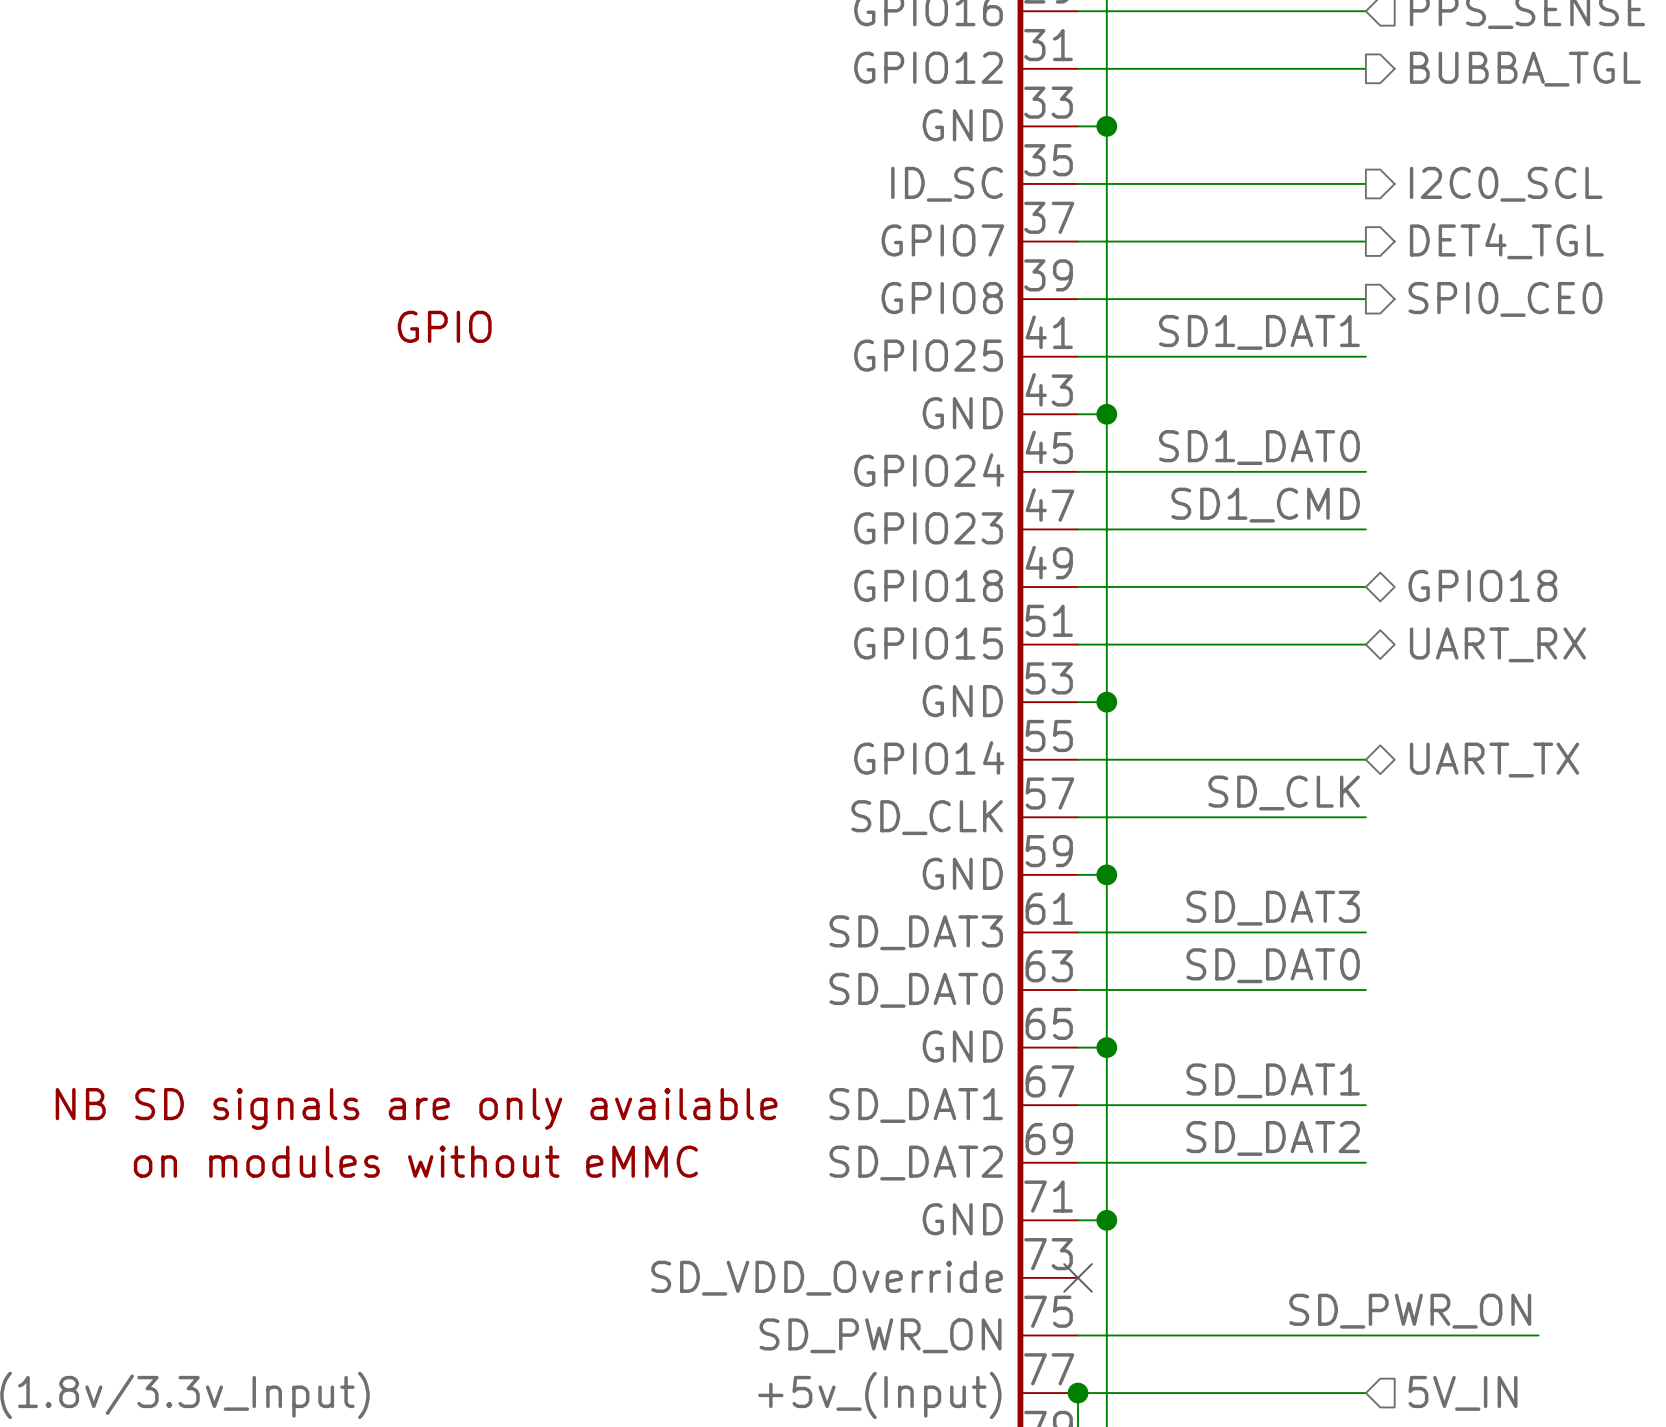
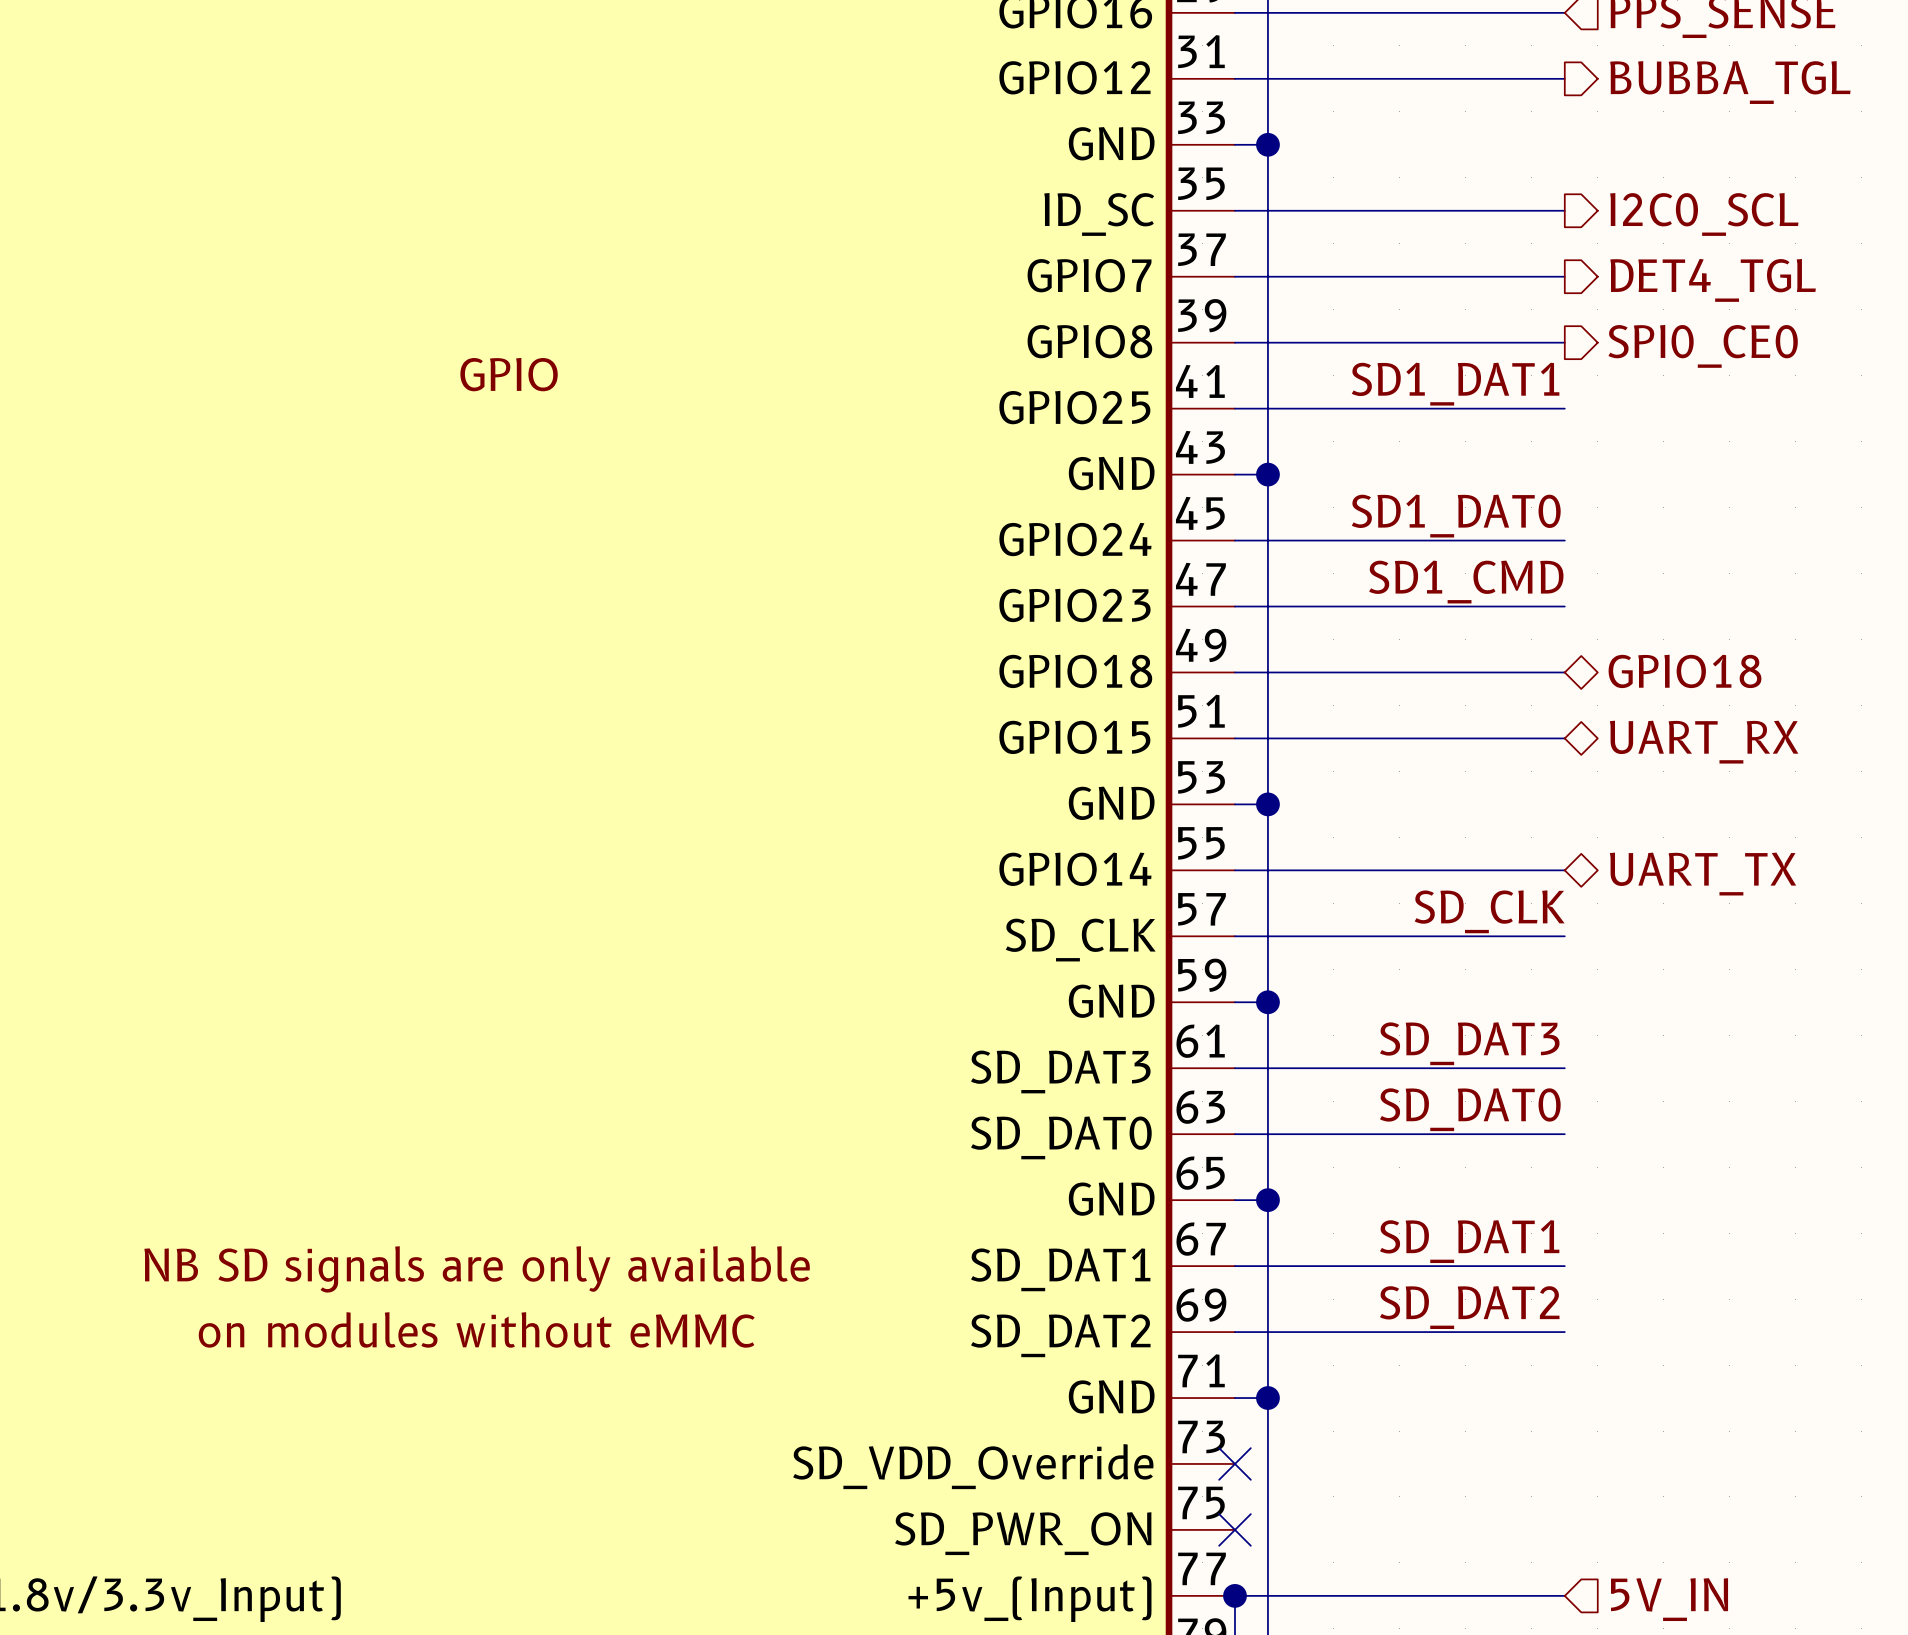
label: SD_PWR_ON (1410, 1311) -> none
wire: (1078, 1335) (1538, 1335) -> none
no-connect mark: none -> (1234, 1529)

